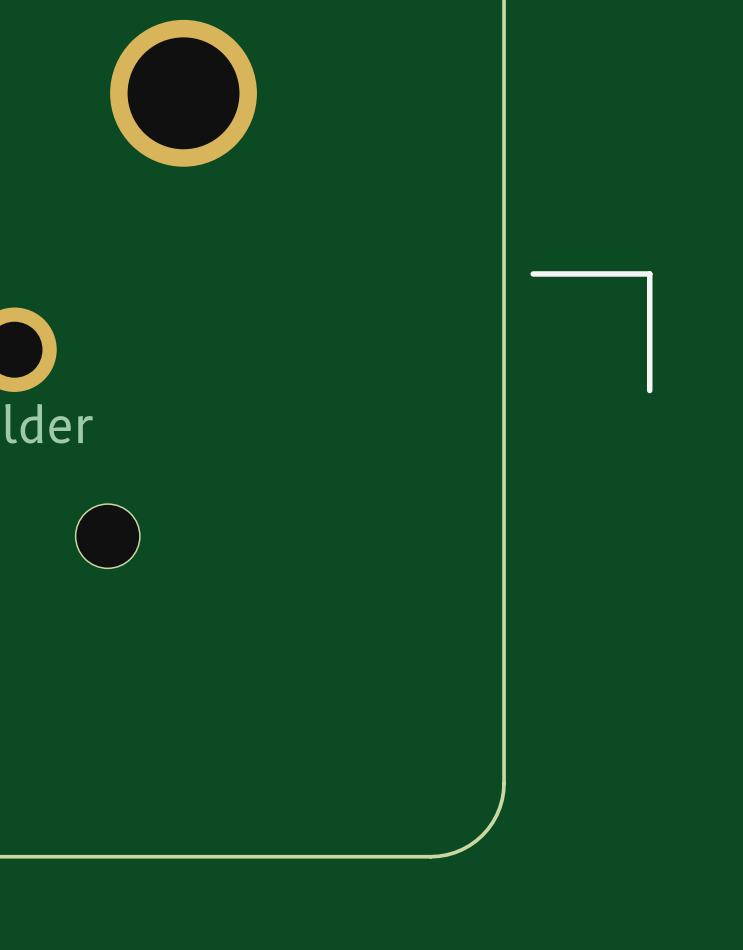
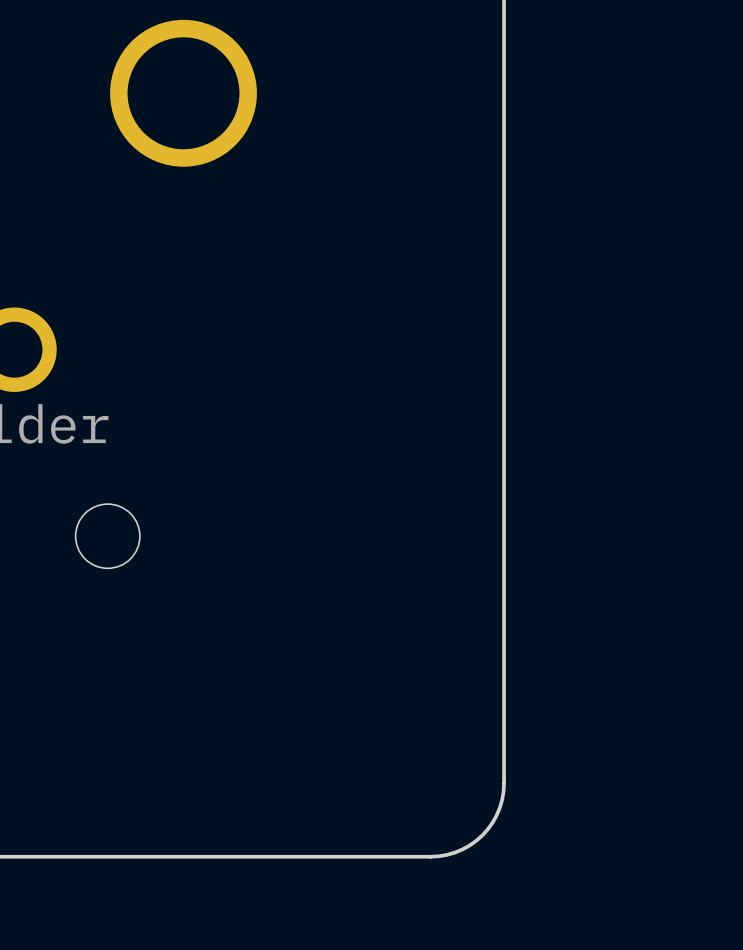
line: (533, 273) (649, 273) (649, 390) -> none

